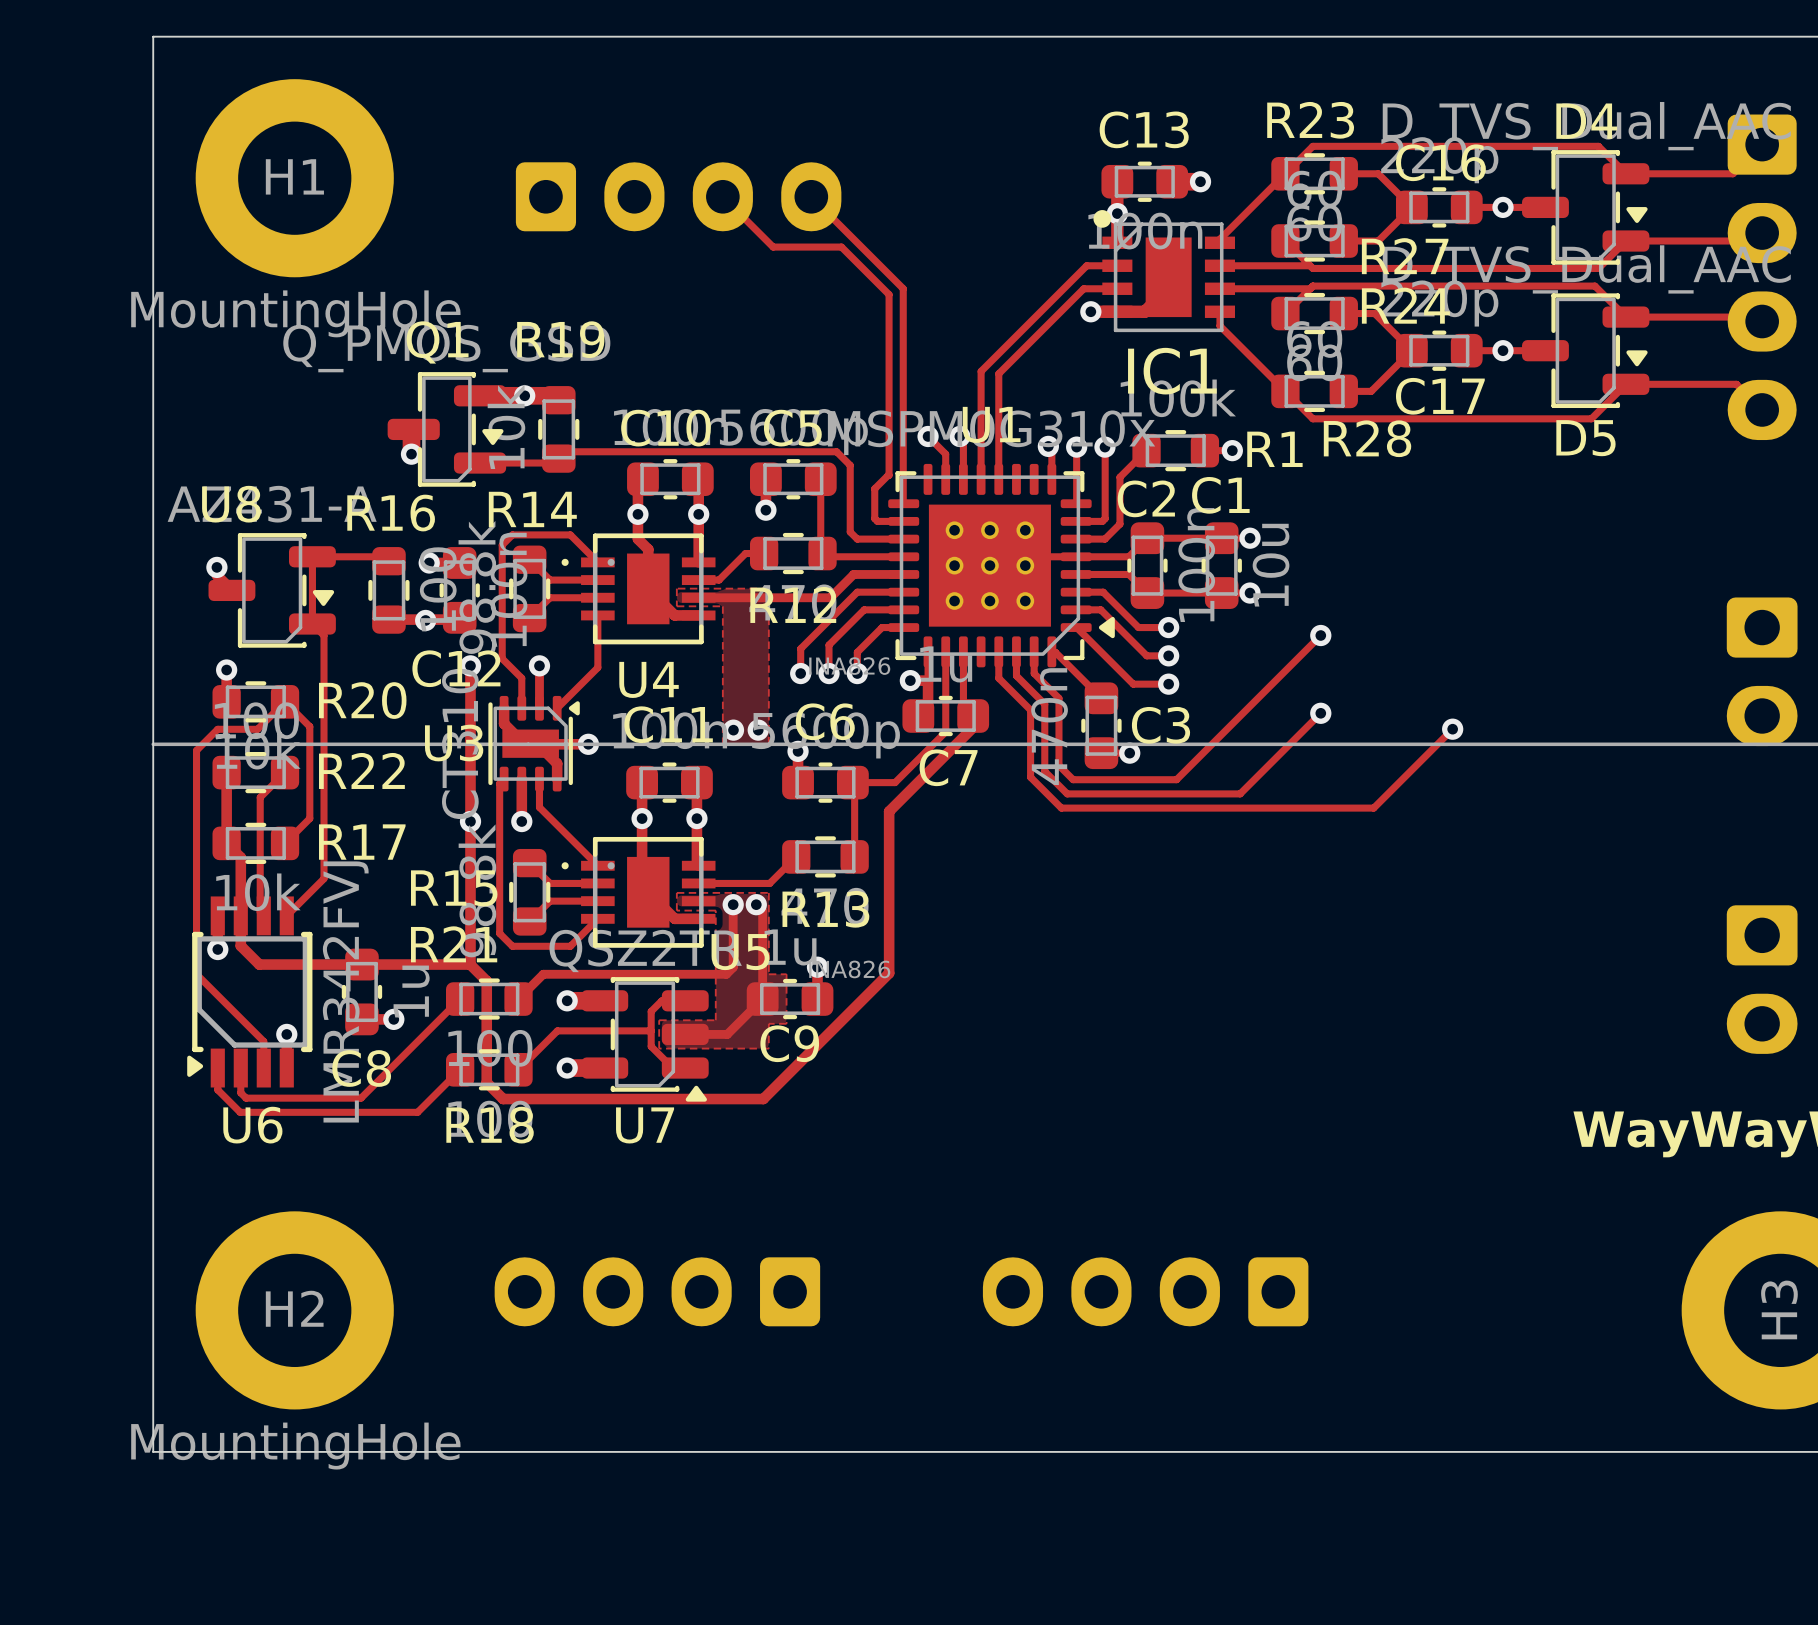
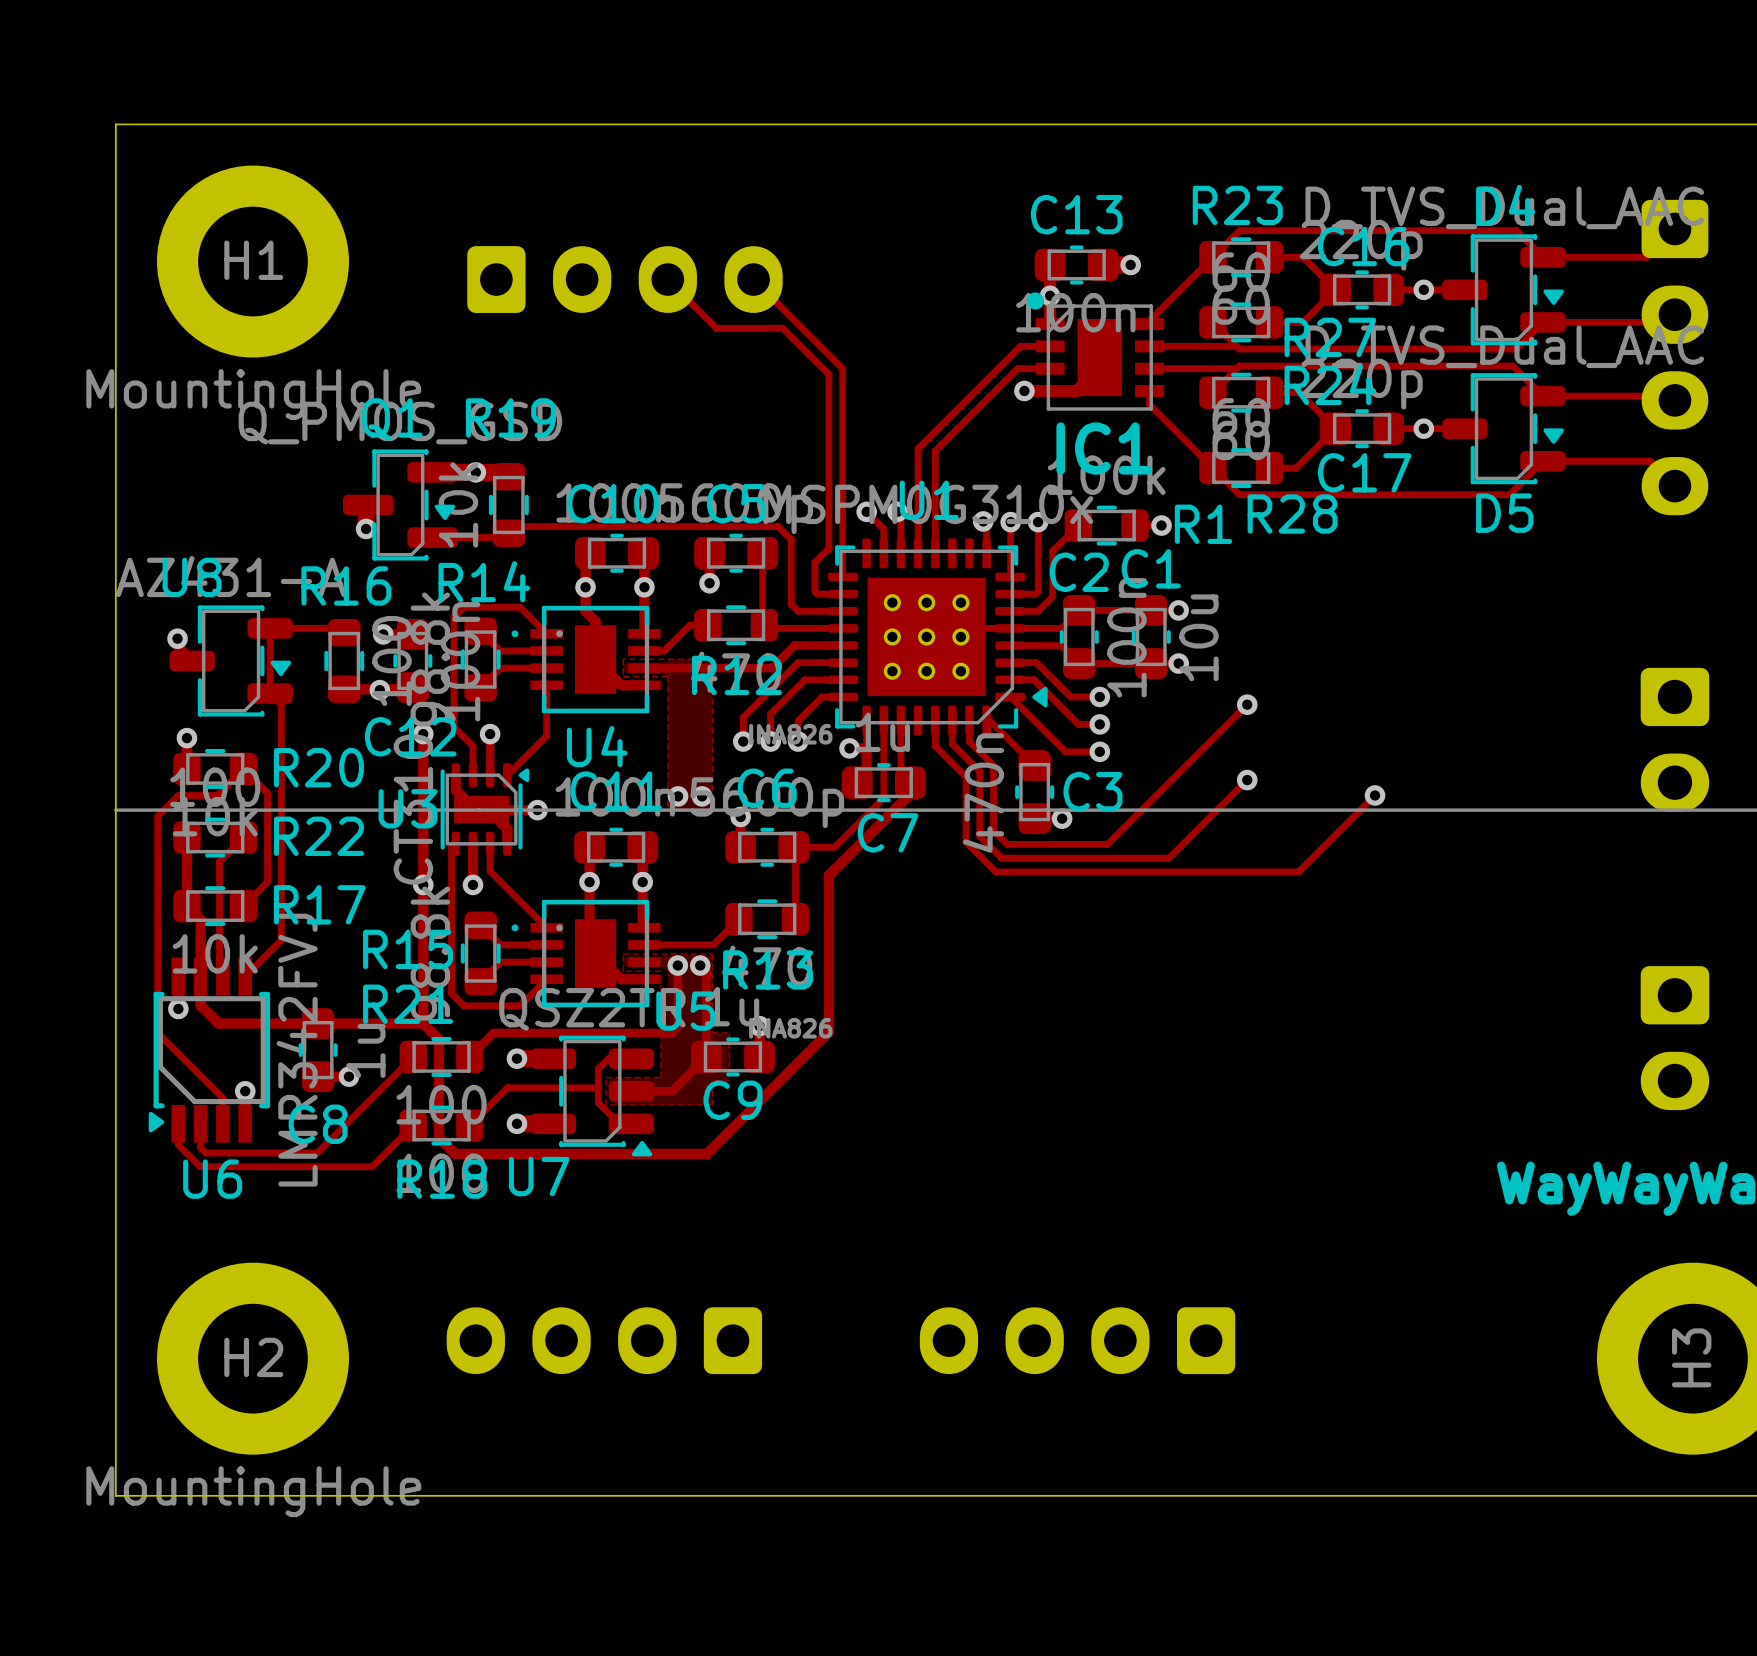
U7 name position: U7 (645, 1125) -> U7 (539, 1176)

